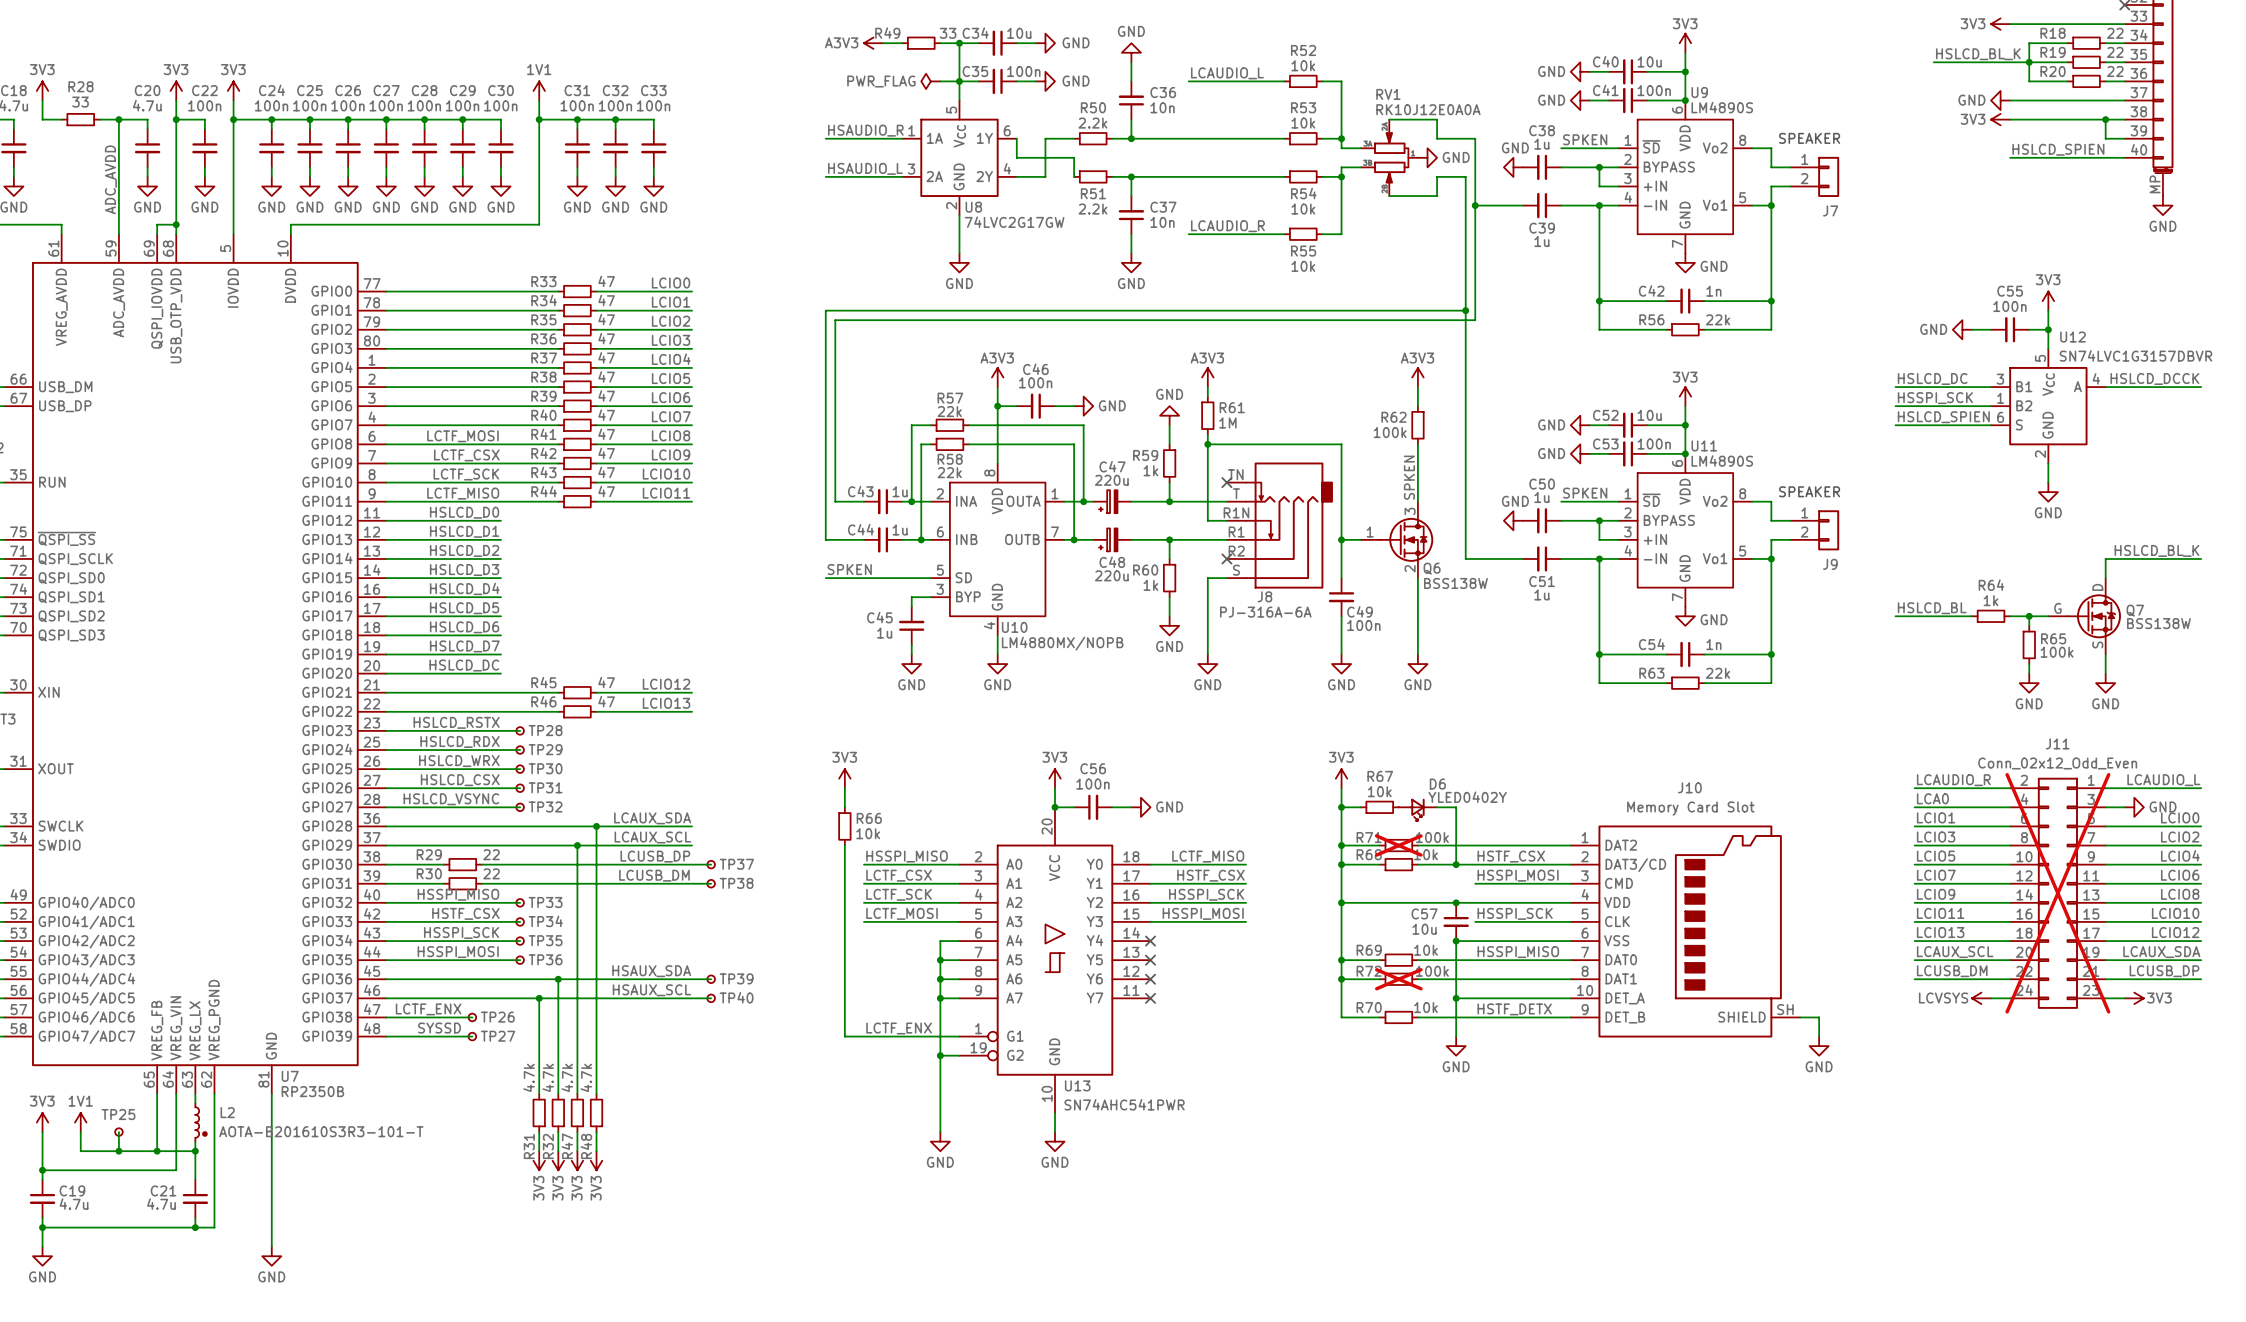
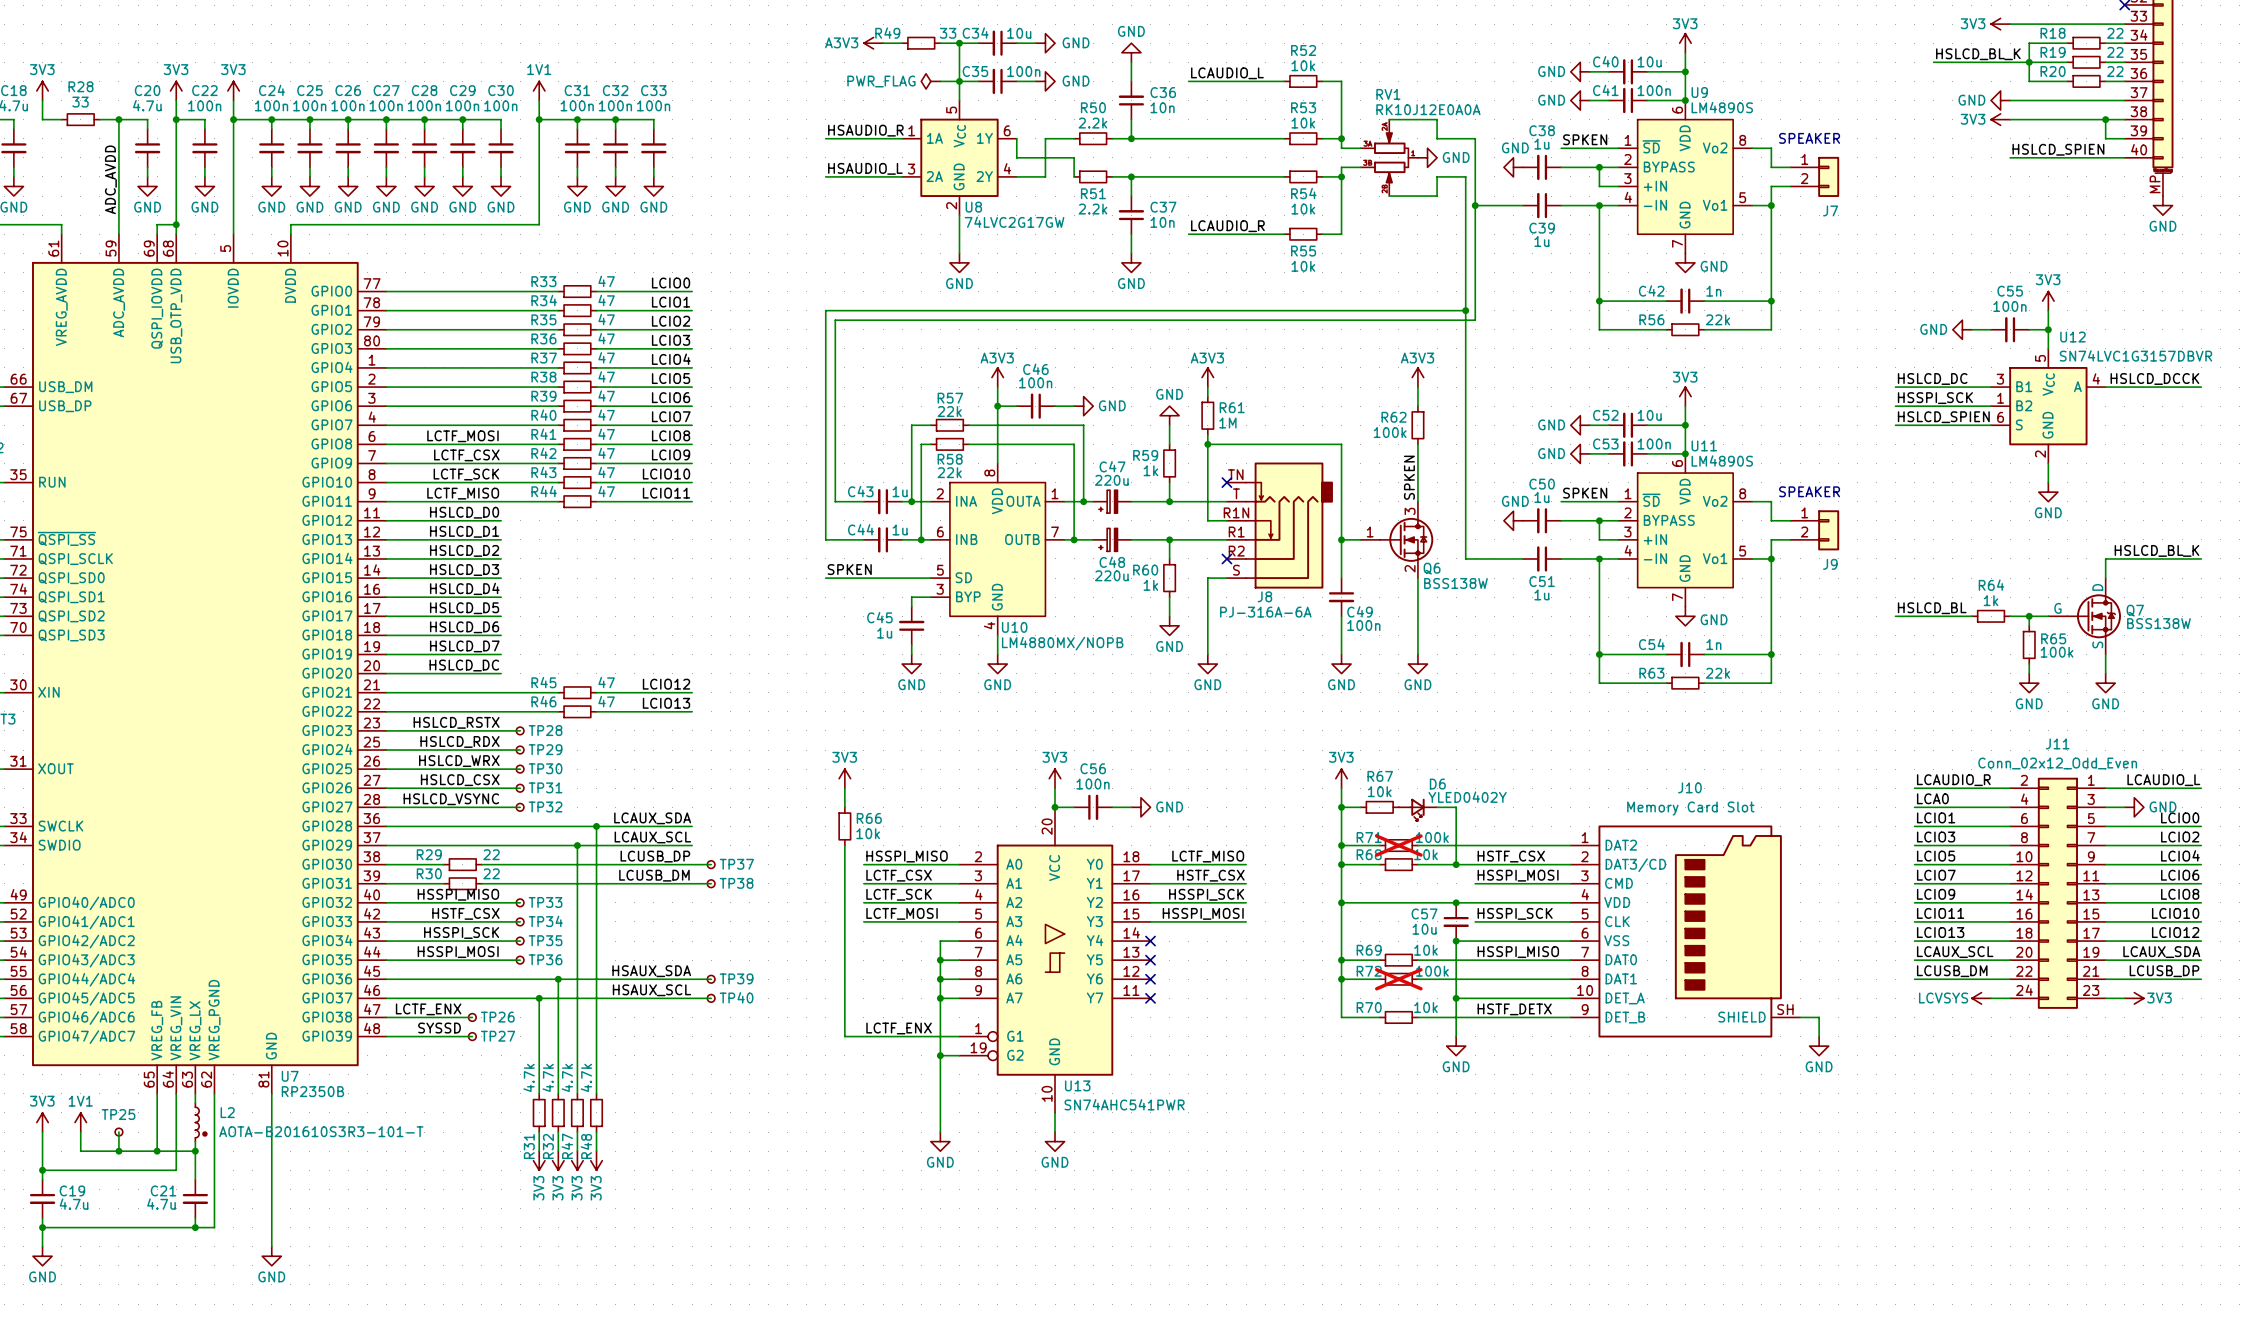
J11 do-not-place cross: (2057, 893) -> none

